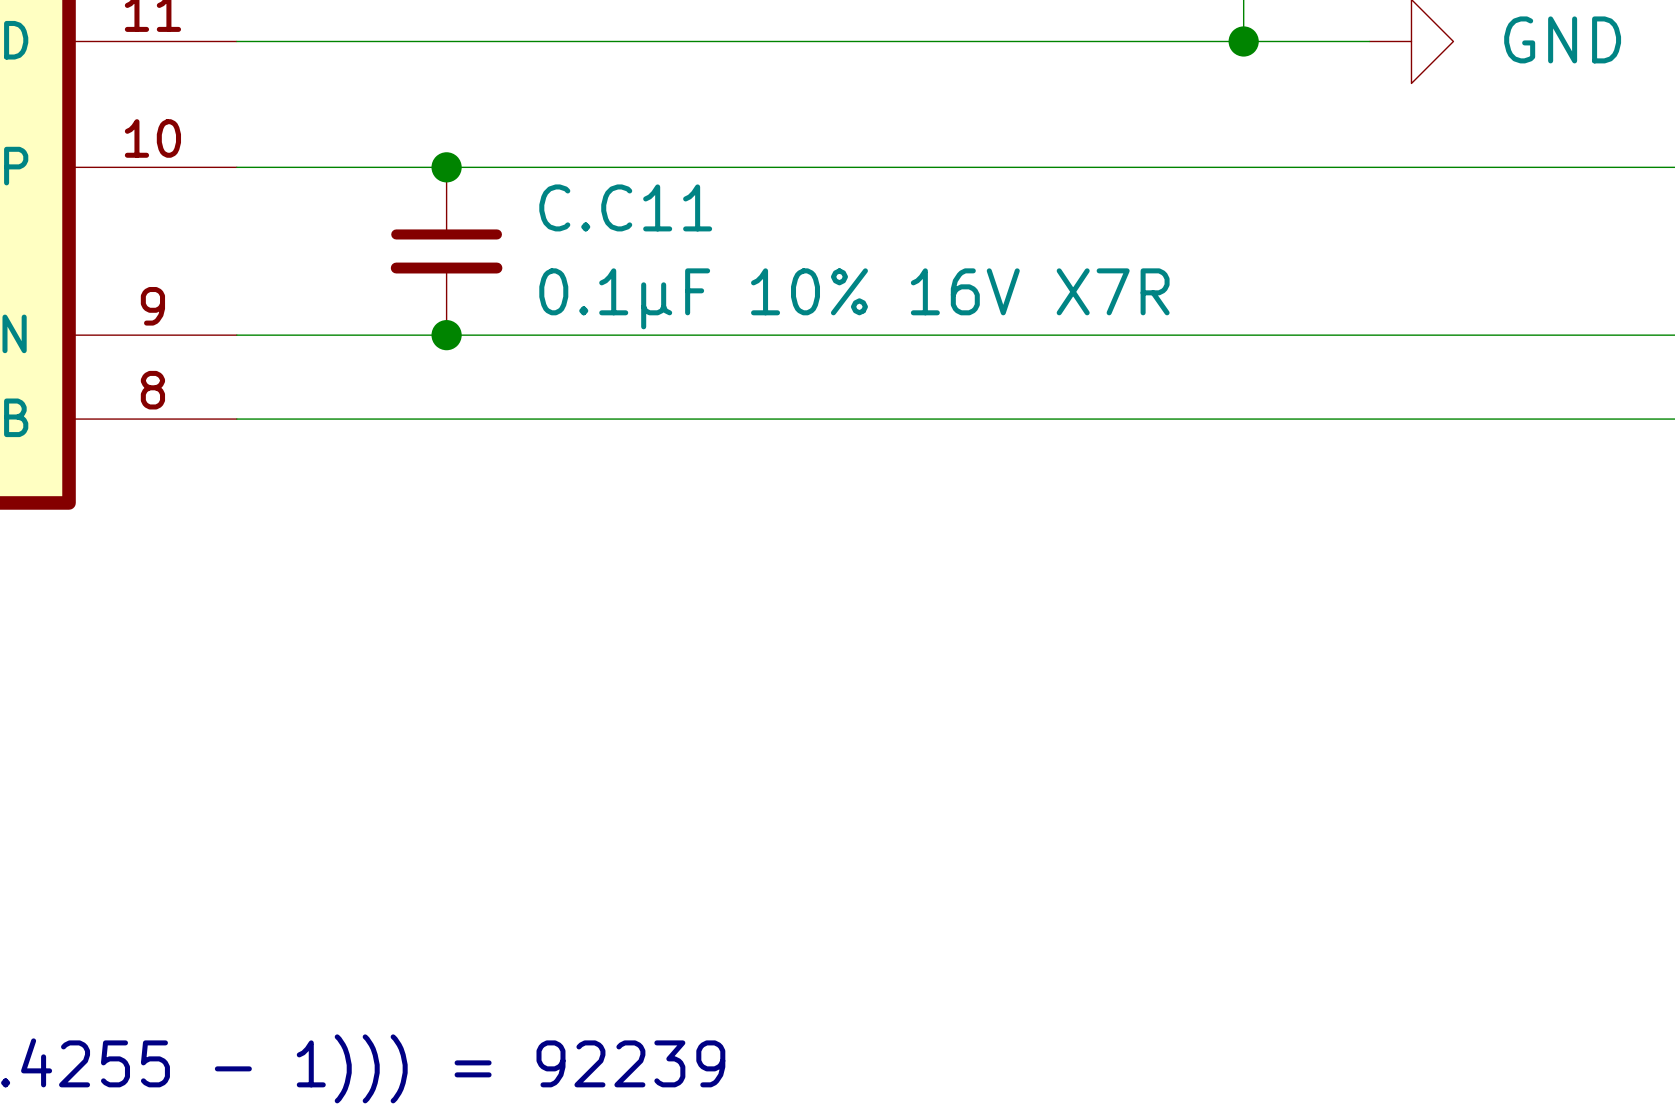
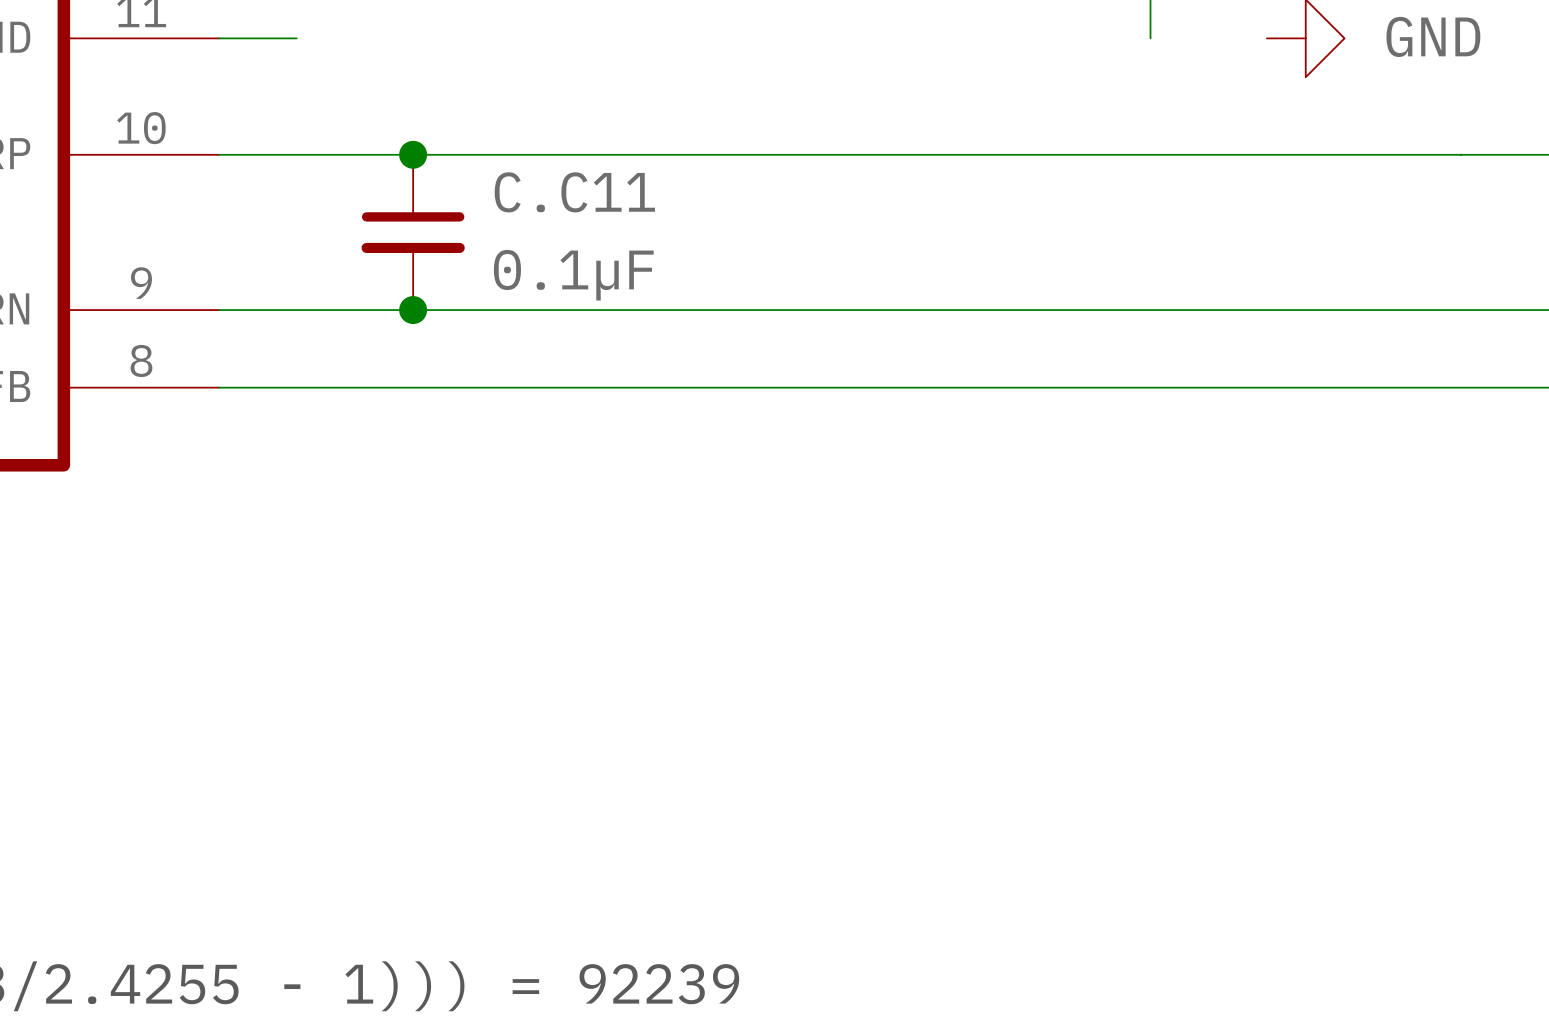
wire: (320, 41) (1369, 41) -> none
junction: (1243, 41) -> none
C.C11 value: 0.1µF 10% 16V X7R (854, 298) -> 0.1µF (573, 275)

